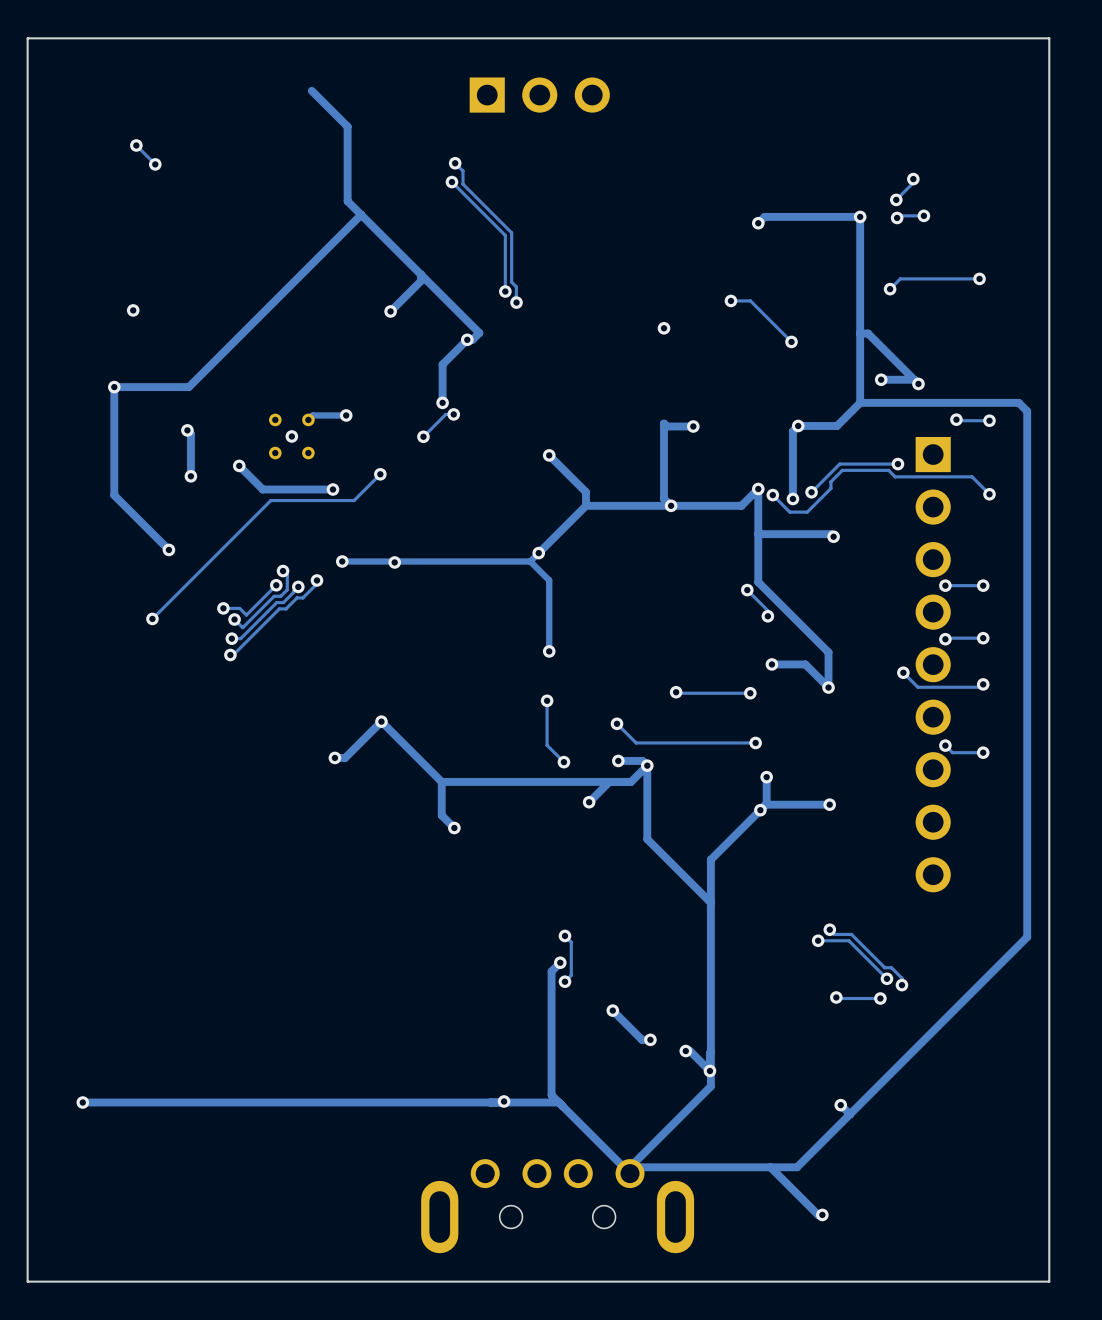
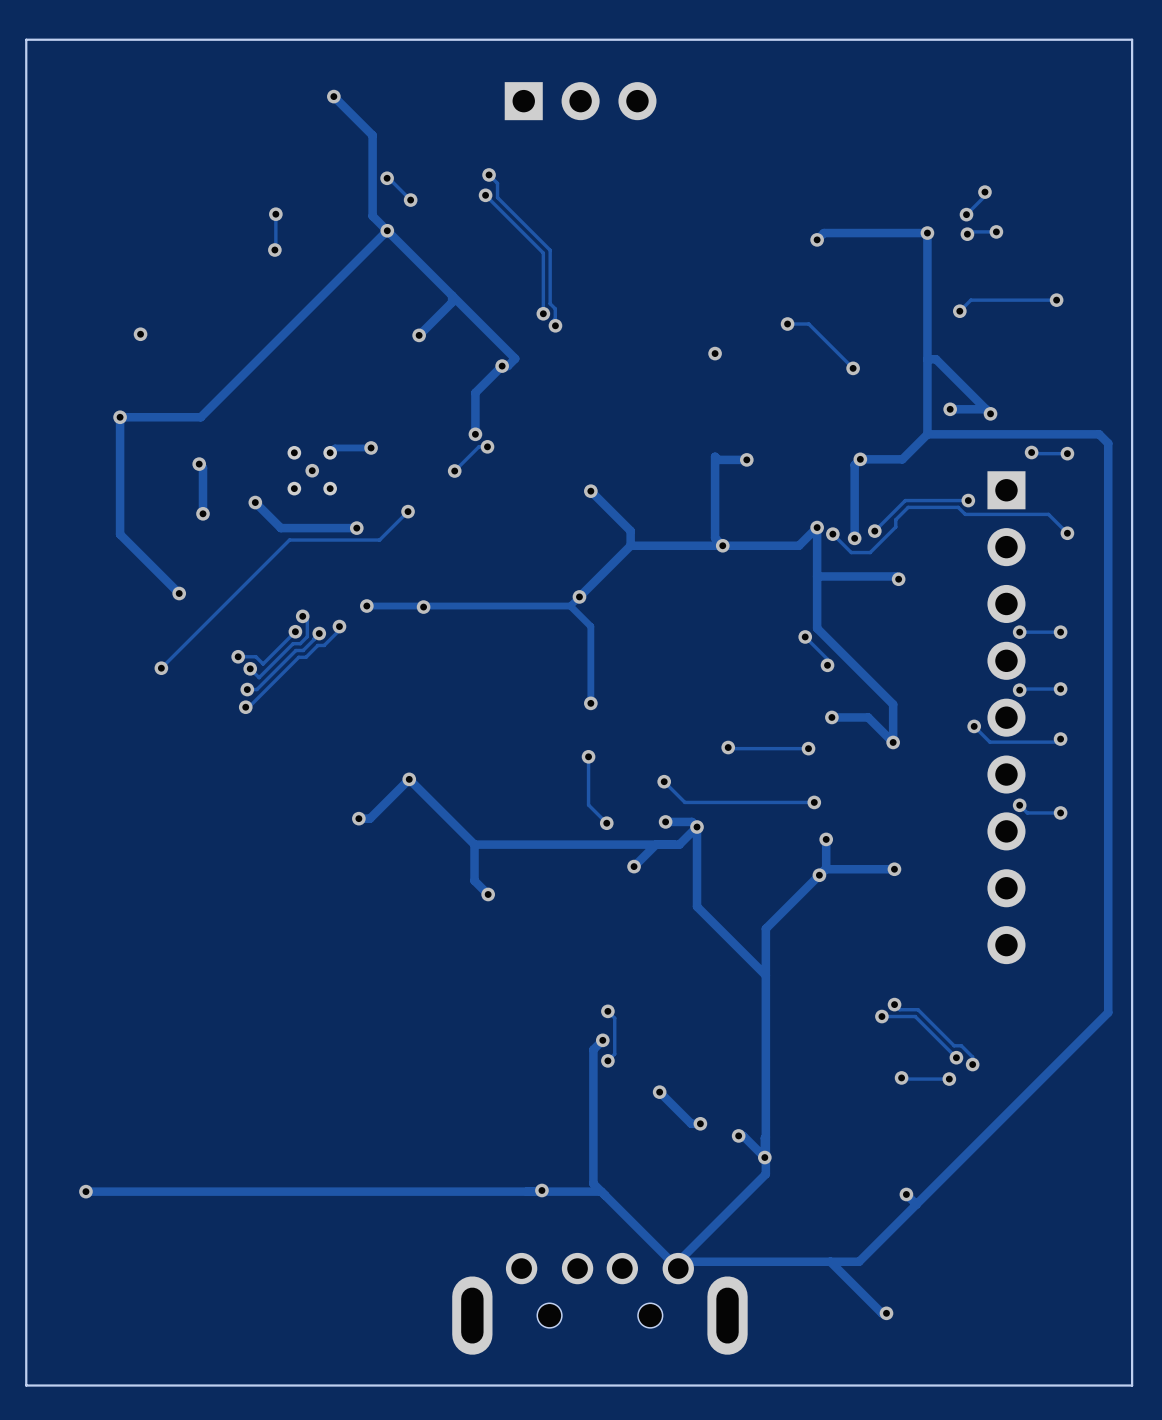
via: none -> (333, 96)
track: (136, 145) (155, 164) -> none
via: (136, 145) -> none
via: (155, 164) -> none
track: none -> (387, 178) (410, 200)
via: none -> (387, 178)
via: none -> (410, 200)
track: none -> (275, 214) (274, 250)
via: none -> (275, 214)
via: none -> (387, 230)
via: none -> (274, 250)

